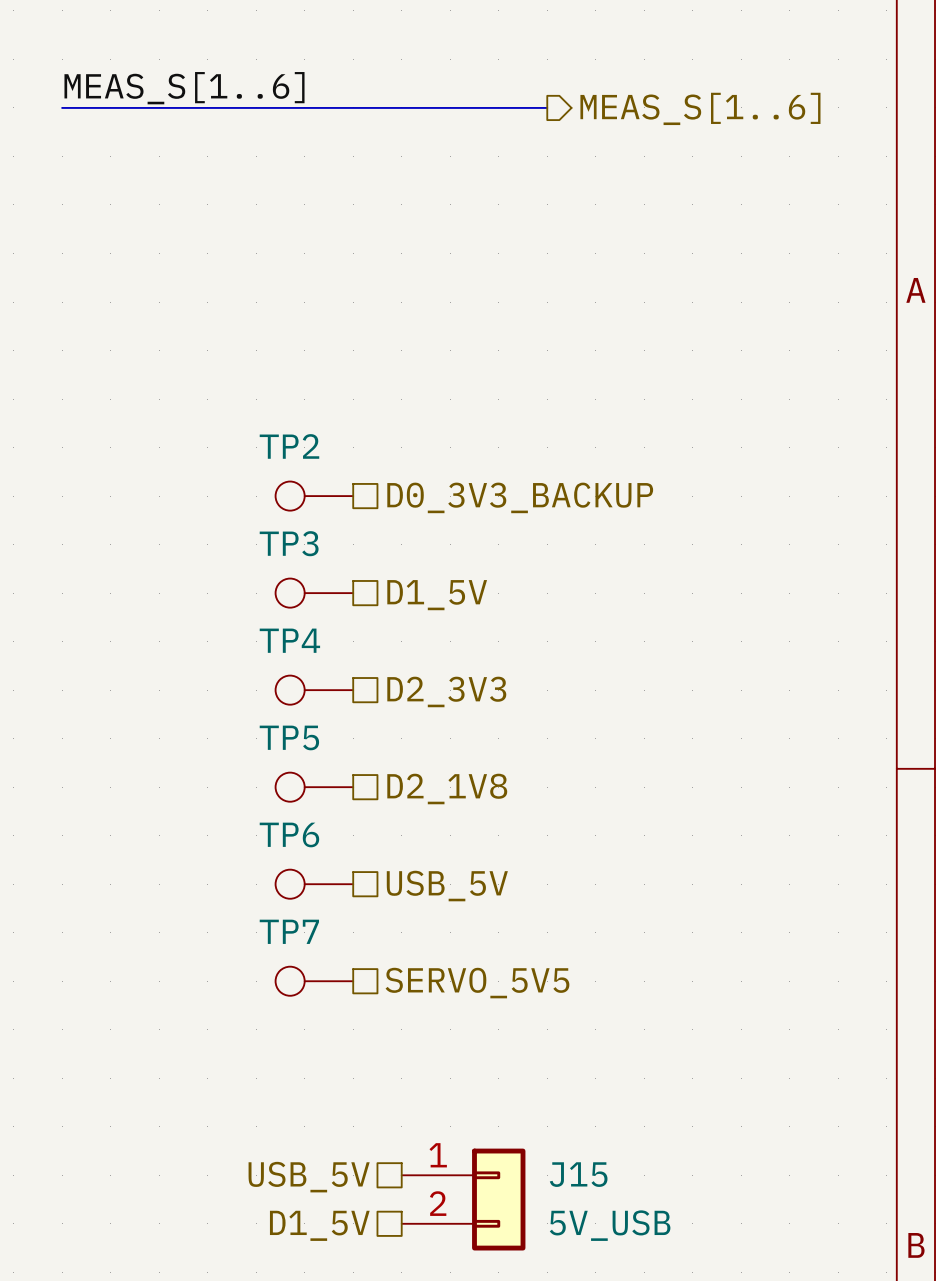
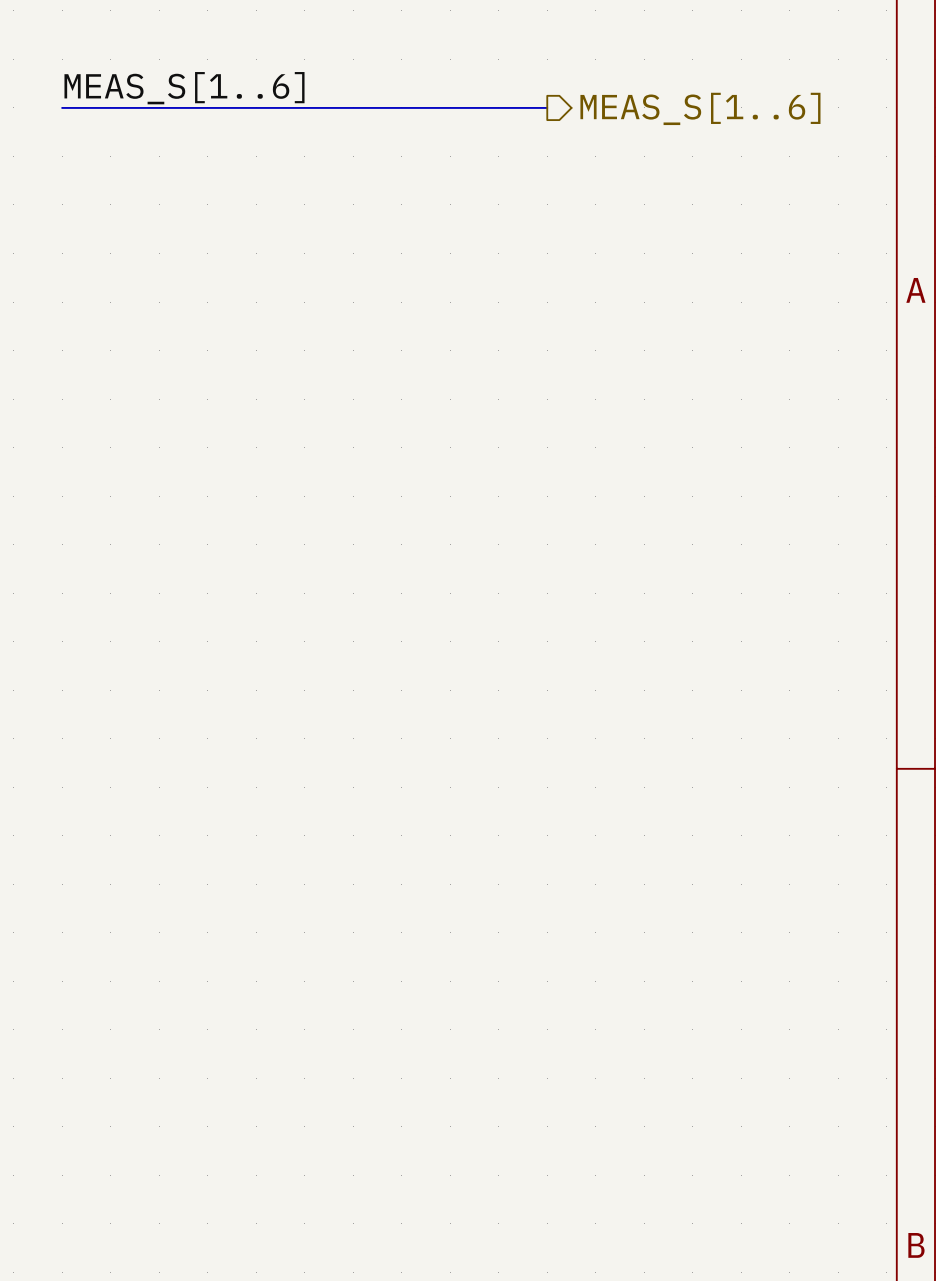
TP2: (314, 496) -> none
hierarchical label: D0_3V3_BACKUP (520, 497) -> none
TP3: (314, 593) -> none
hierarchical label: D1_5V (437, 595) -> none
TP4: (314, 690) -> none
hierarchical label: D2_3V3 (446, 691) -> none
TP5: (314, 787) -> none
hierarchical label: D2_1V8 (447, 788) -> none
TP6: (314, 884) -> none
hierarchical label: USB_5V (447, 886) -> none
TP7: (314, 981) -> none
hierarchical label: SERVO_5V5 (477, 983) -> none
hierarchical label: USB_5V (309, 1177) -> none
J15: 5V_USB (463, 1199) -> none
hierarchical label: D1_5V (319, 1225) -> none

